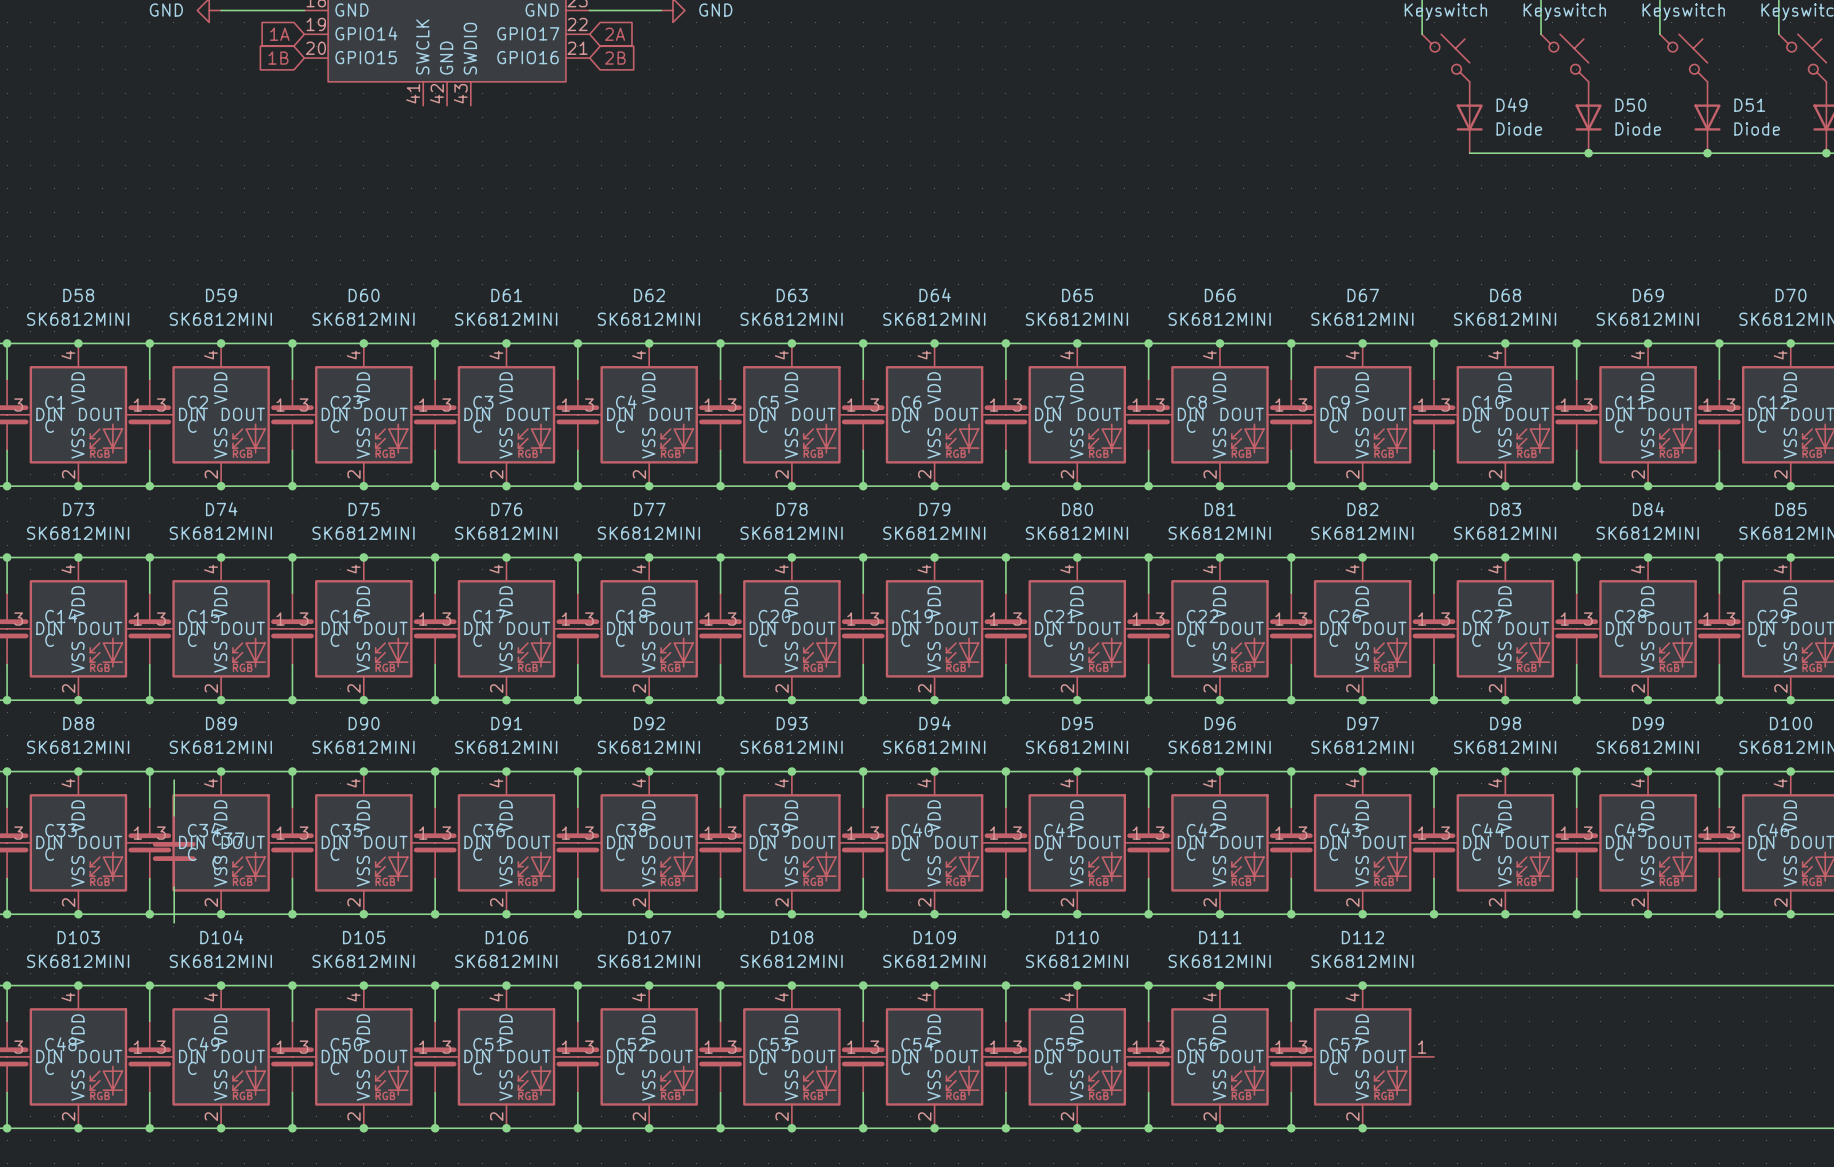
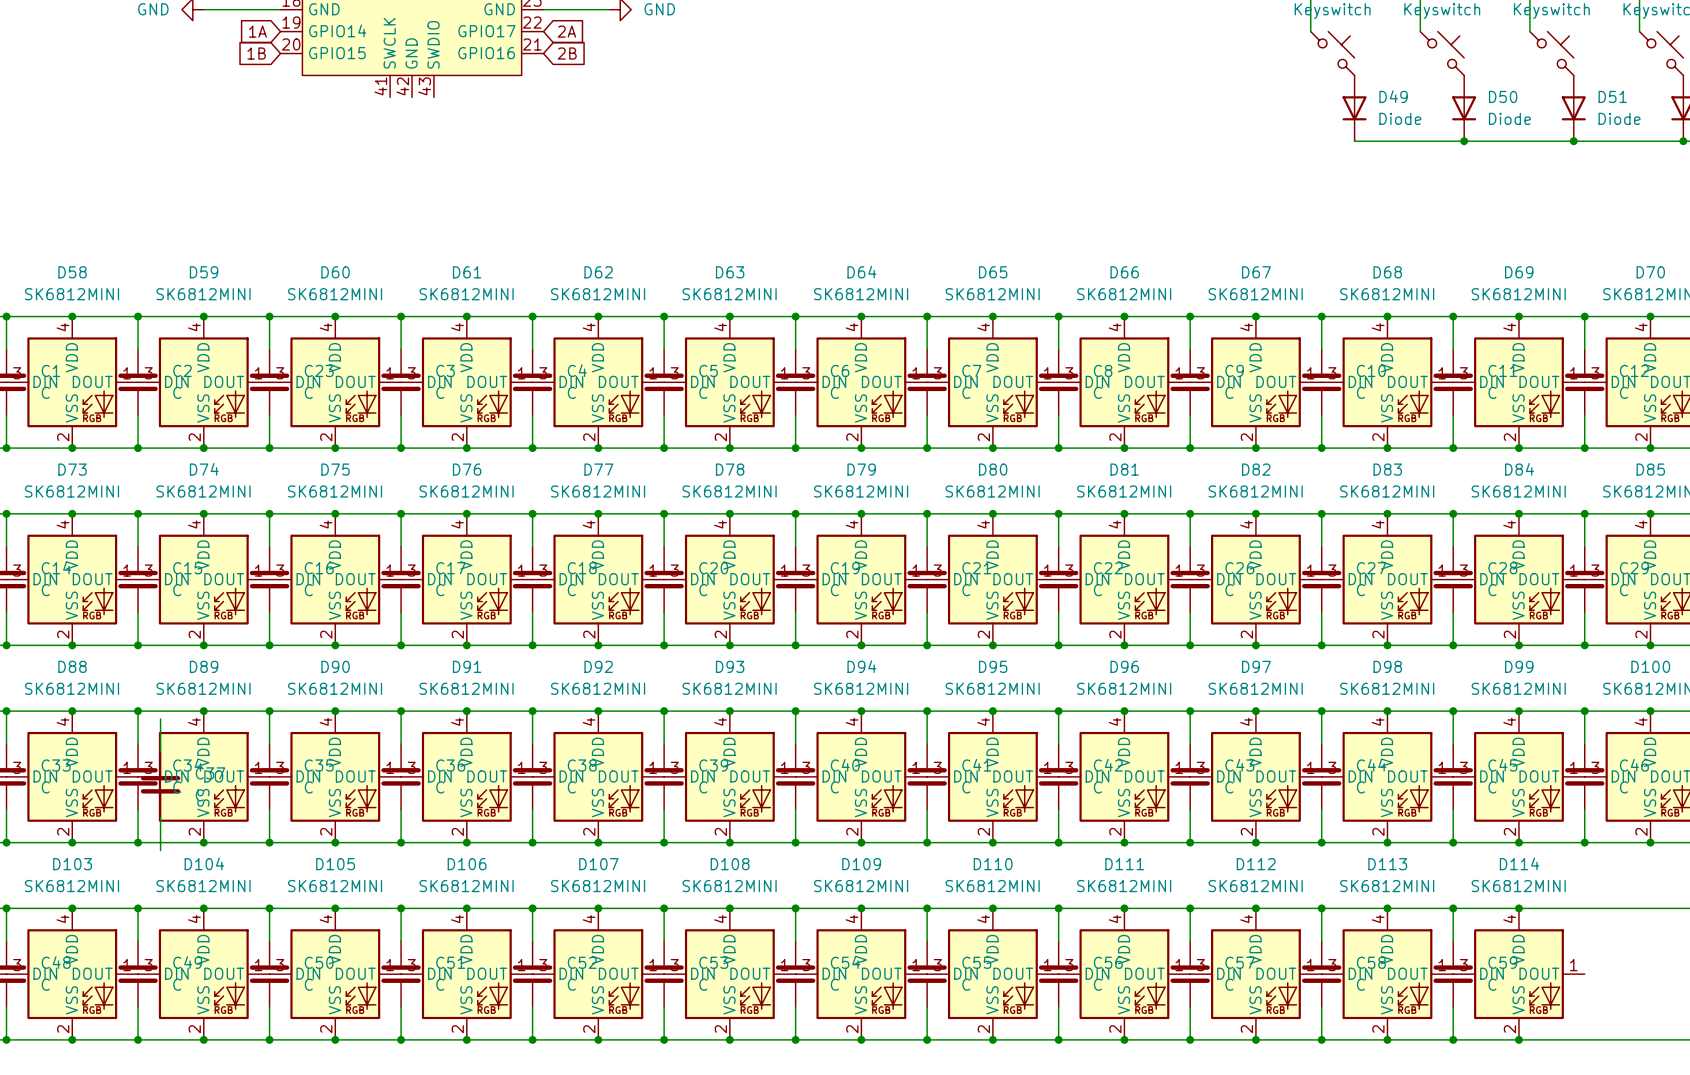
wire: none -> (1321, 908) (1321, 941)
junction: none -> (1321, 908)
junction: none -> (1387, 908)
wire: none -> (1453, 908) (1453, 941)
junction: none -> (1453, 908)
junction: none -> (1518, 908)
C58: none -> C (1321, 974)
D113: none -> SK6812MINI (1387, 974)
C59: none -> C (1453, 974)
D114: none -> SK6812MINI (1518, 974)
wire: none -> (1321, 1007) (1321, 1039)
wire: none -> (1453, 1007) (1453, 1039)
junction: none -> (1321, 1039)
junction: none -> (1387, 1039)
junction: none -> (1453, 1039)
junction: none -> (1518, 1039)

